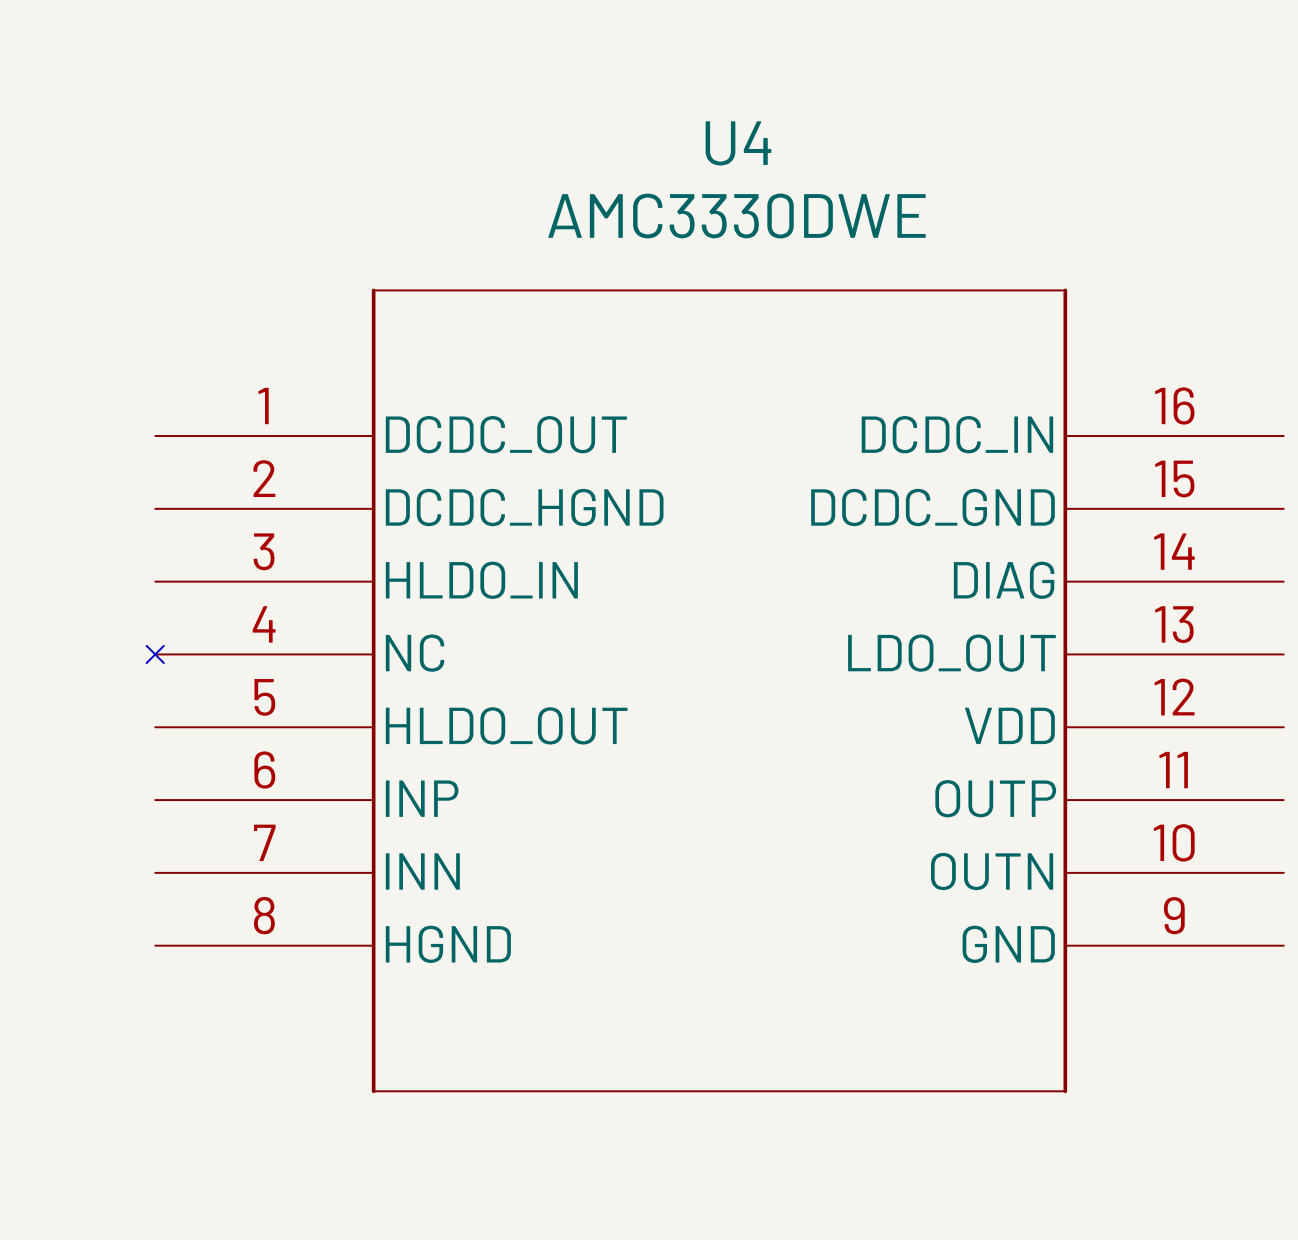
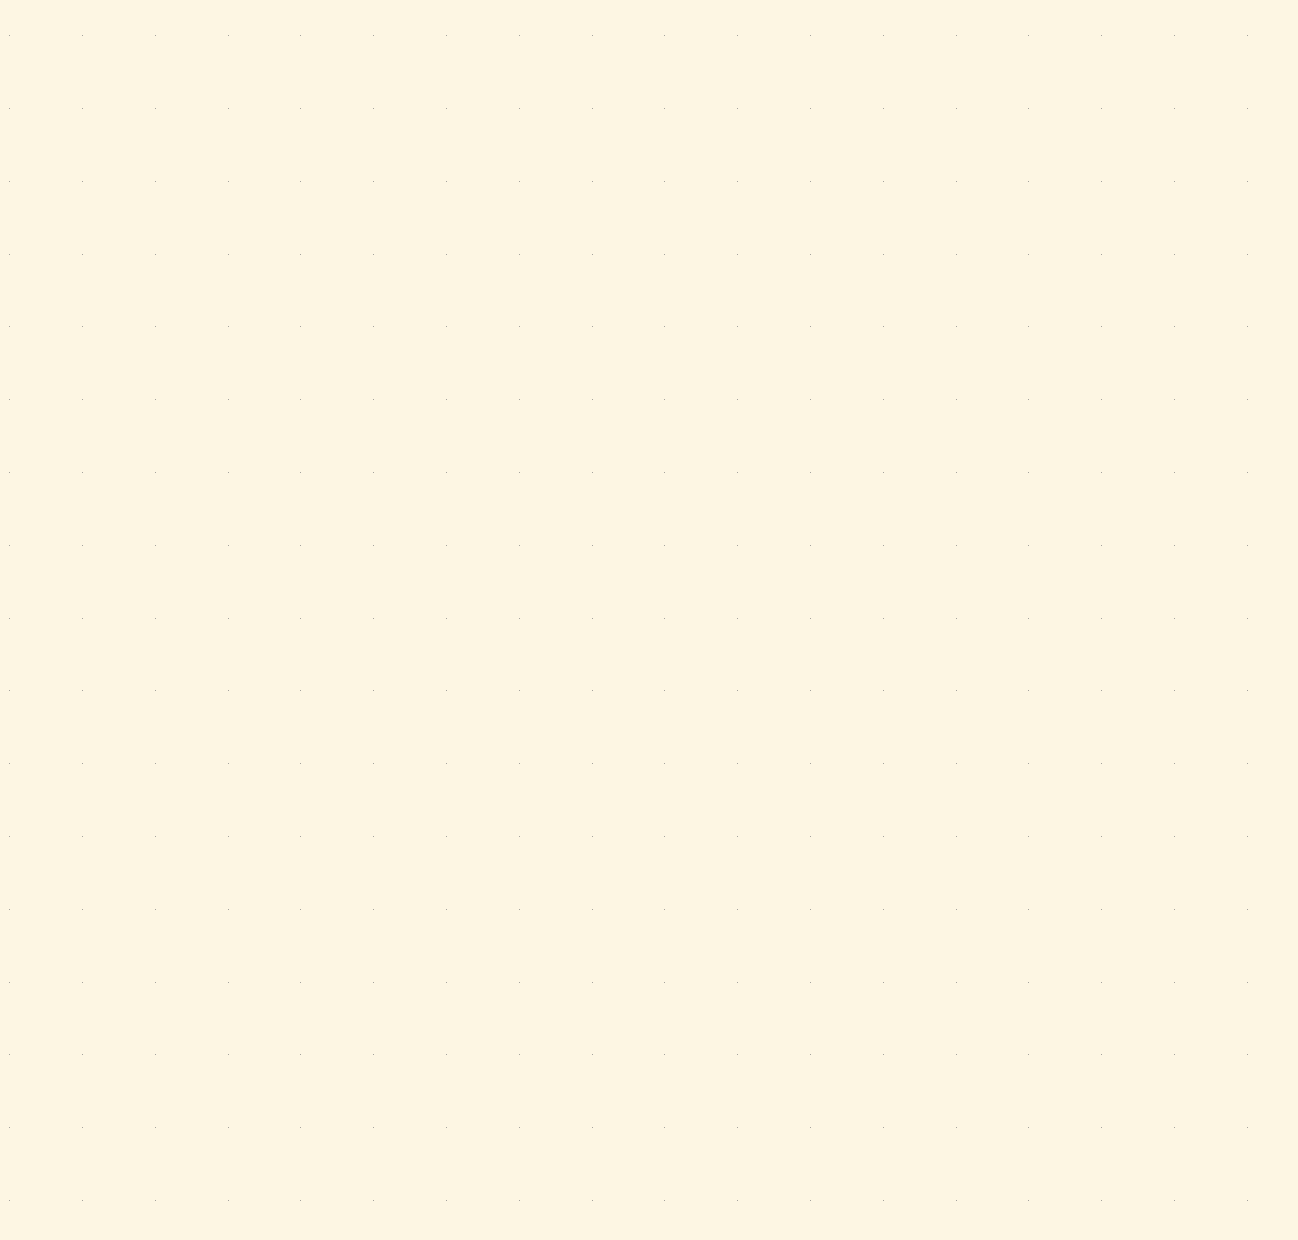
U4: AMC3330DWE (715, 690) -> none

